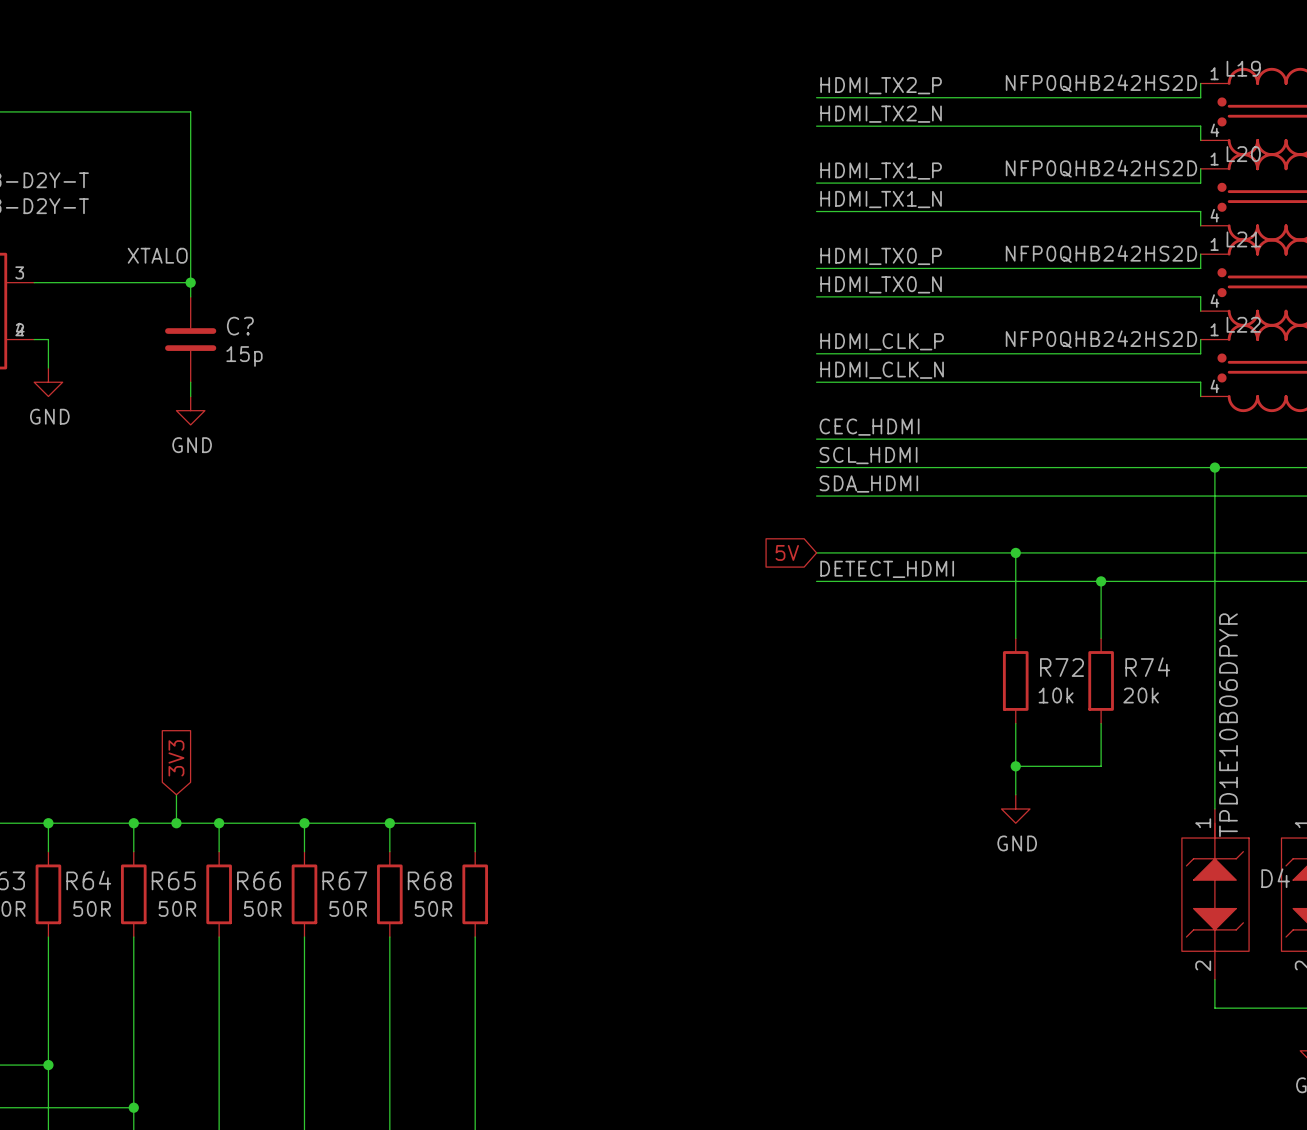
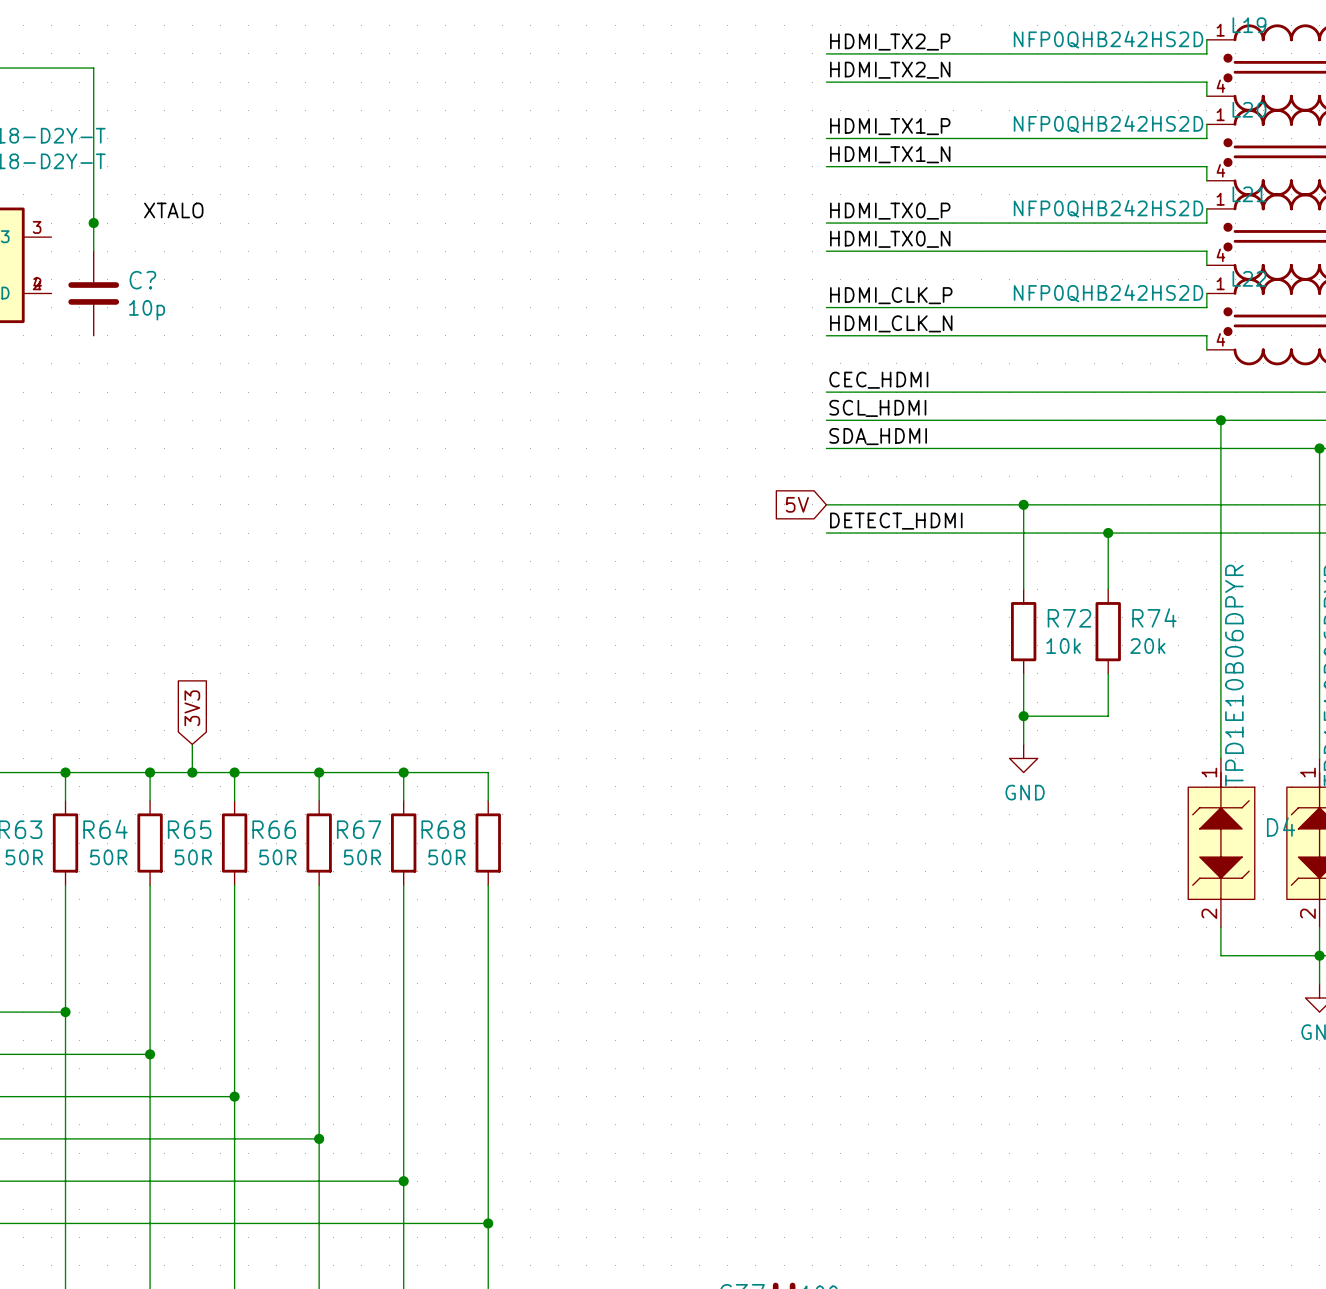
wire: (76, 111) (190, 111) (190, 296) -> (93, 68) (93, 251)
junction: none -> (93, 223)
wire: (34, 282) (190, 282) -> none
junction: (190, 282) -> none
wire: (34, 339) (48, 339) (48, 368) -> none
C?: none -> (93, 293)
C?: (190, 339) -> none
power symbol: GND (48, 382) -> none
wire: (190, 382) (190, 396) -> none
power symbol: GND (190, 410) -> none

